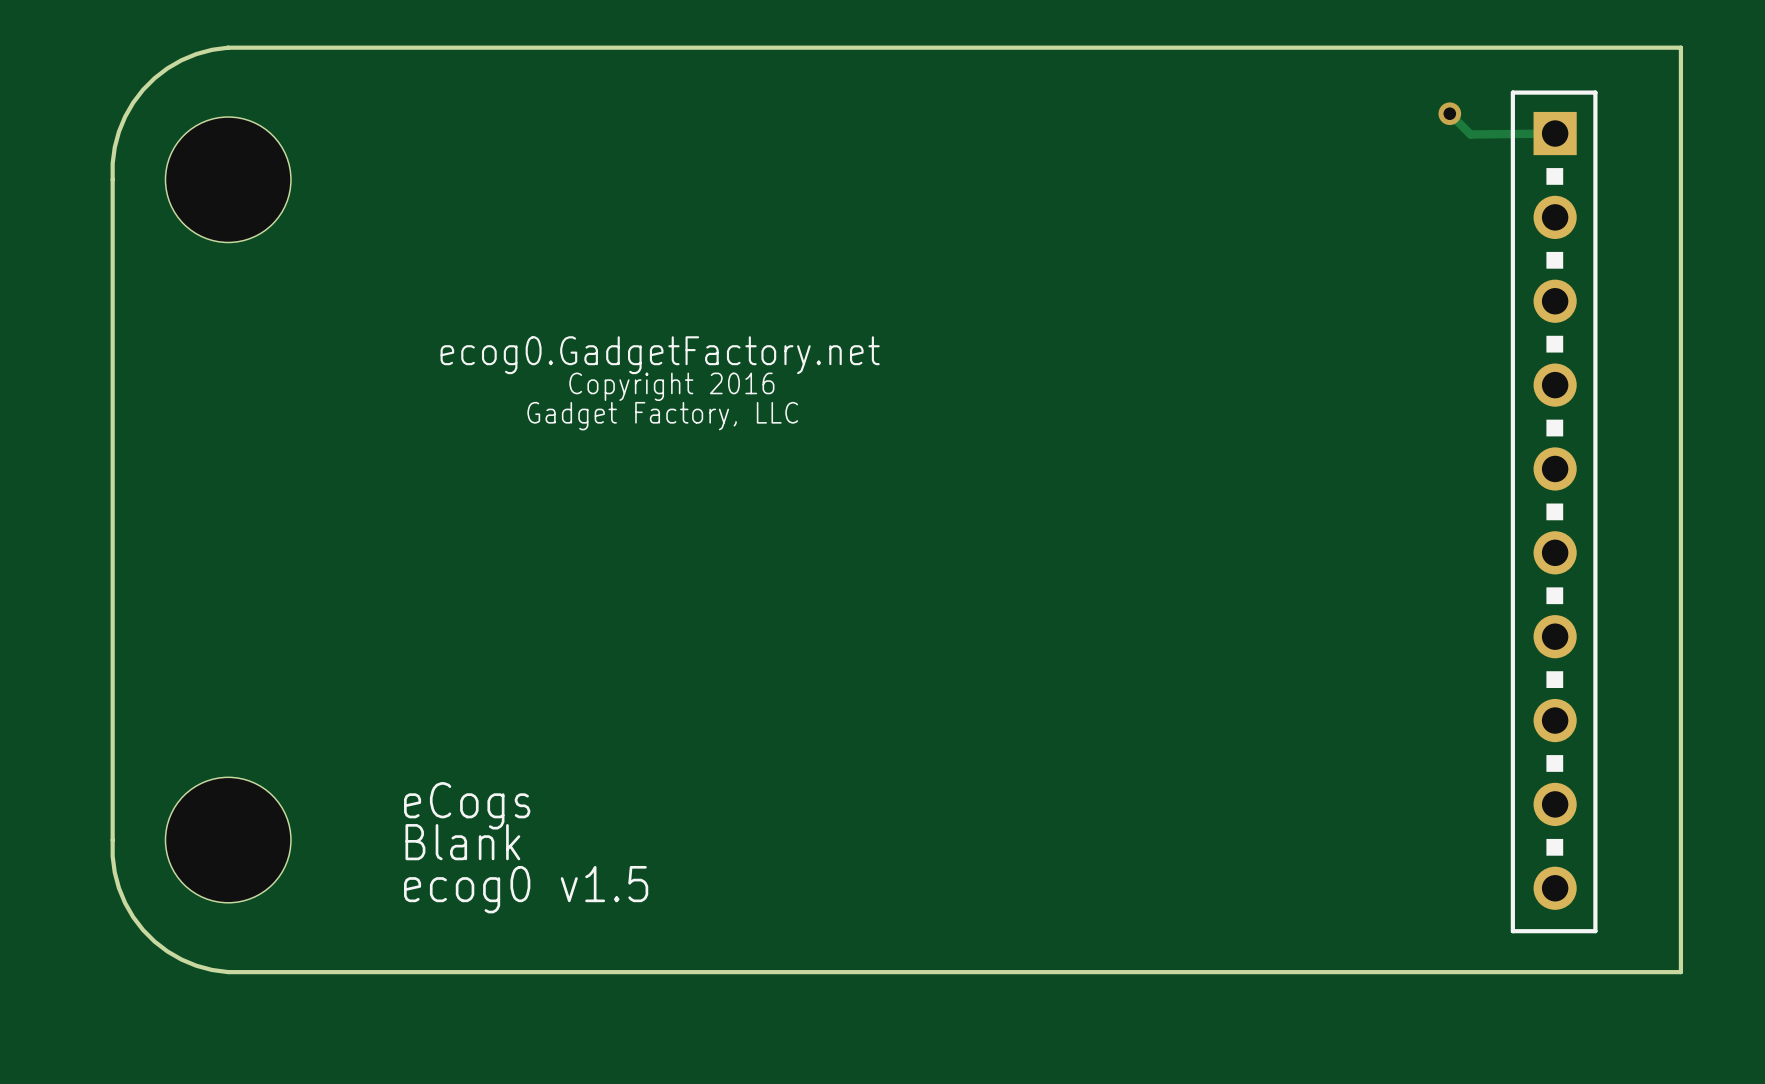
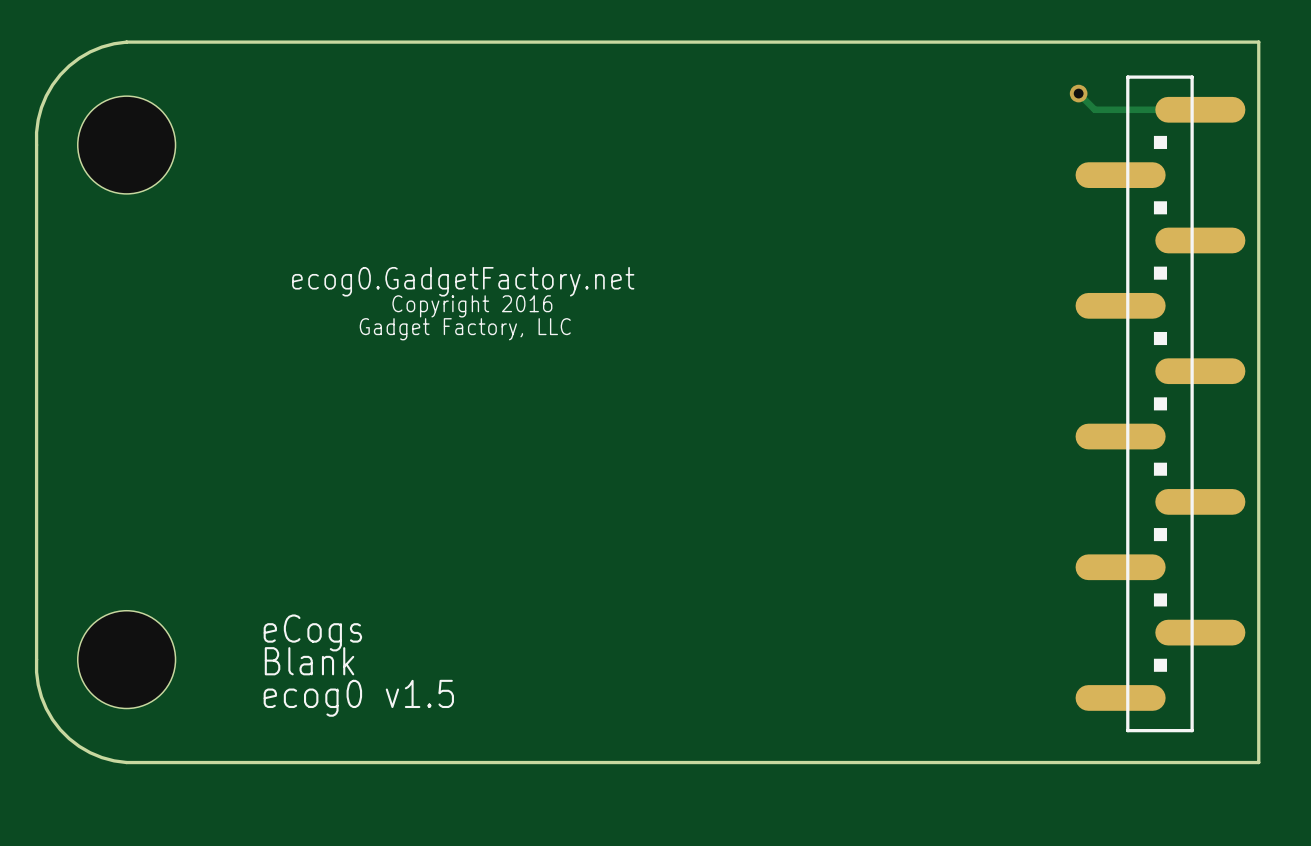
part footprint: [110, 45, 1684, 975] -> [34, 40, 1261, 765]
track: (1555, 133) (1470, 134) -> (1200, 109) (1094, 109)

